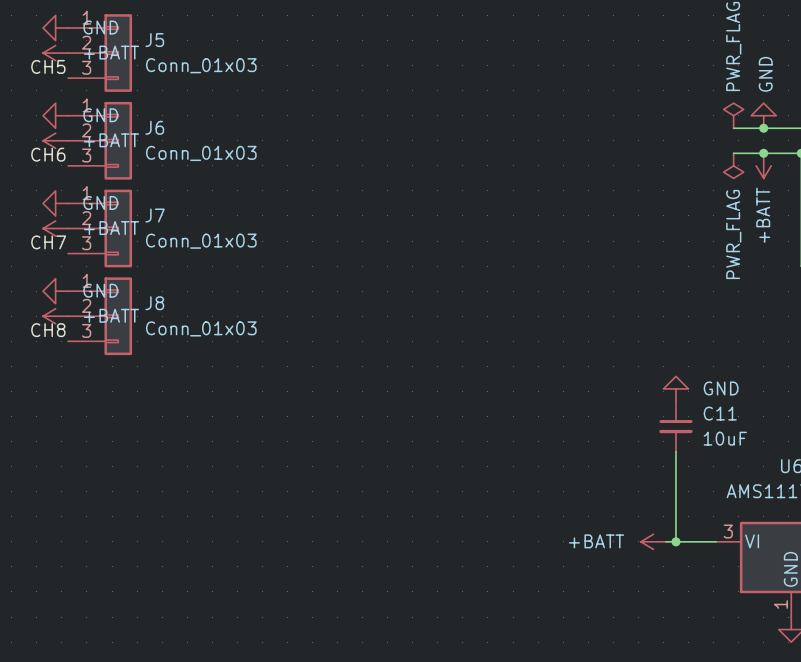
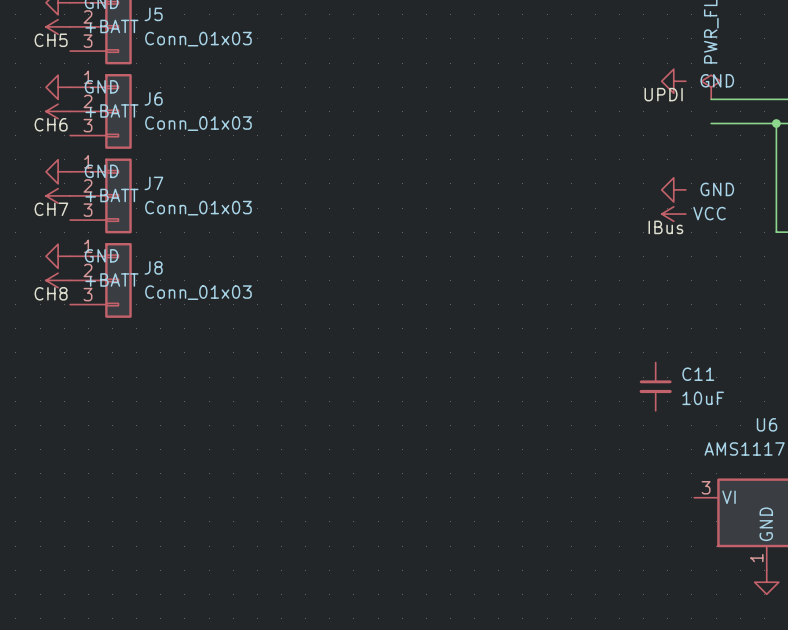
power symbol: none -> GND (673, 81)
power symbol: GND (763, 115) -> none
label: none -> UPDI (663, 94)
junction: (763, 128) -> none
junction: (763, 153) -> none
power symbol: PWR_FLAG (733, 165) -> none
power symbol: +BATT (763, 165) -> none
power symbol: none -> GND (673, 189)
power symbol: none -> VCC (673, 214)
label: none -> IBus (665, 227)
power symbol: GND (675, 388) -> none
wire: (675, 451) (675, 541) -> none
power symbol: +BATT (653, 541) -> none
wire: (665, 541) (716, 541) -> none
junction: (675, 541) -> none

